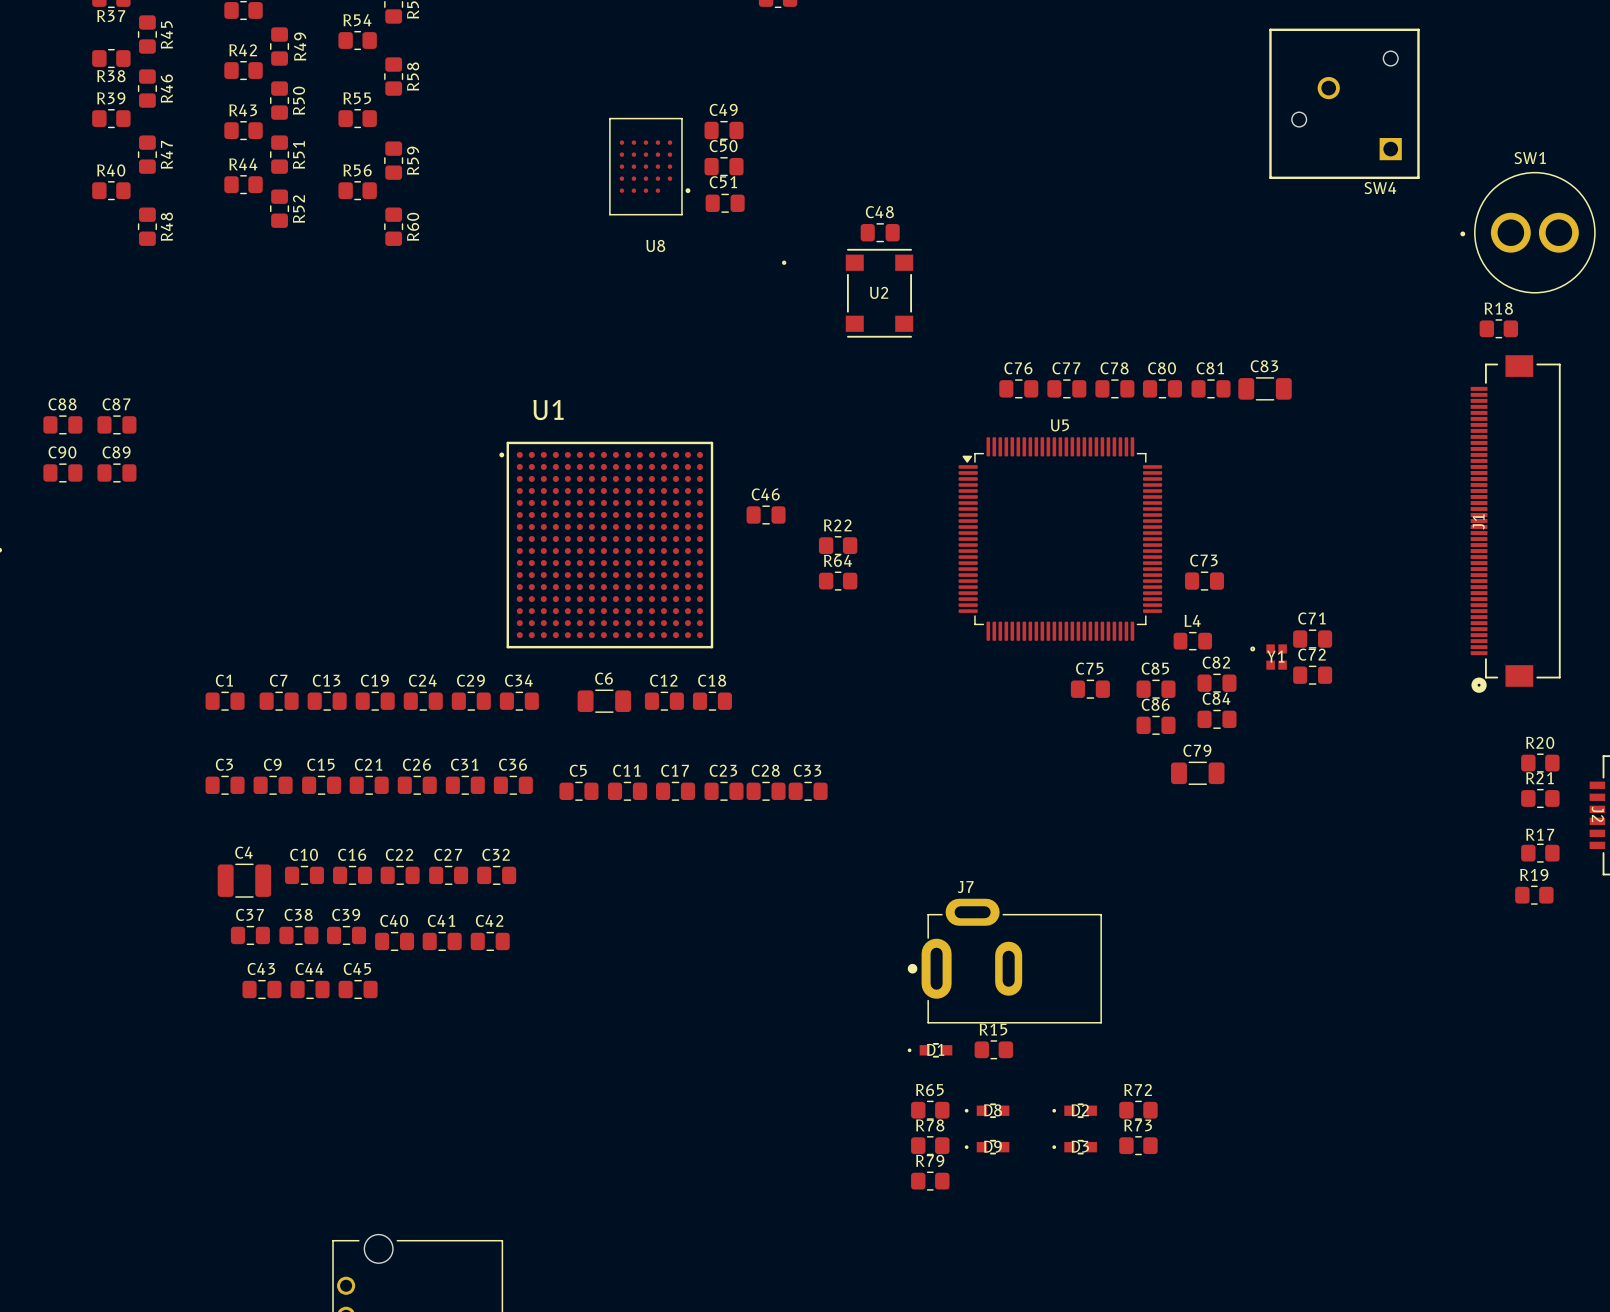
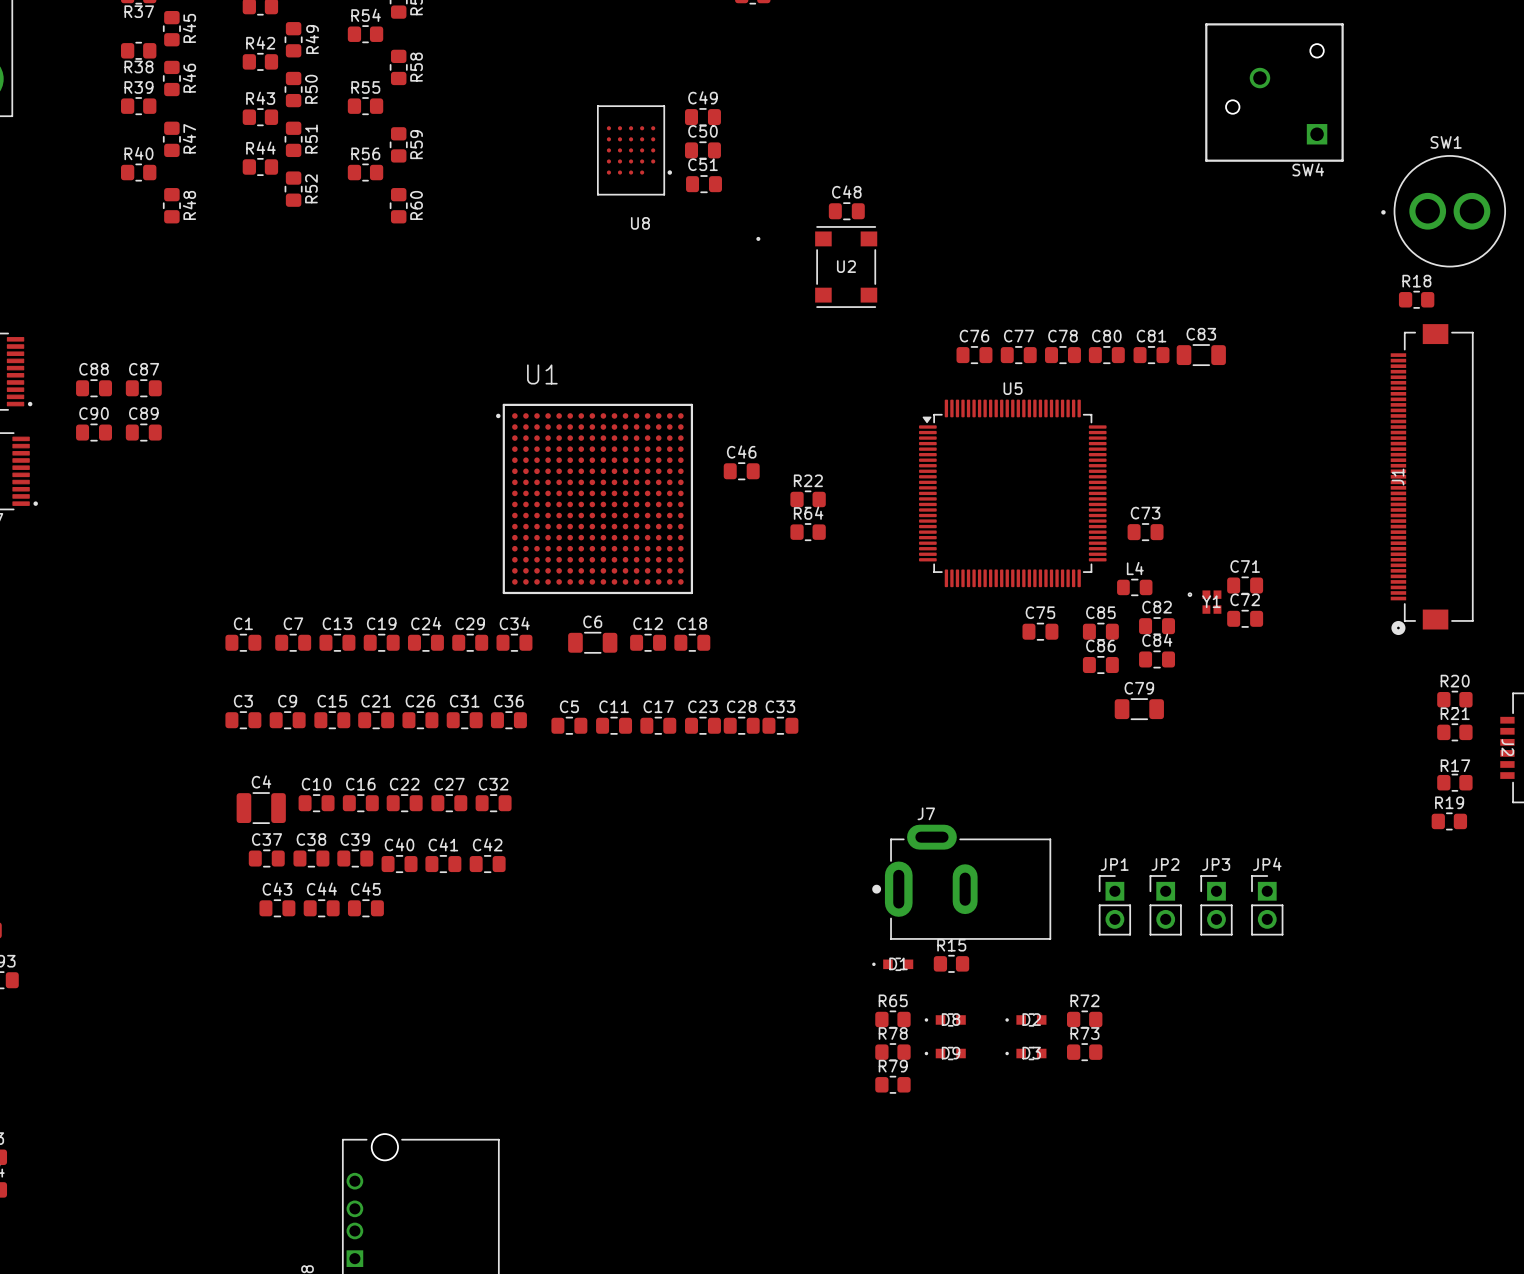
JP1: none -> (1114, 905)
JP2: none -> (1165, 905)
JP3: none -> (1216, 905)
JP4: none -> (1267, 905)

